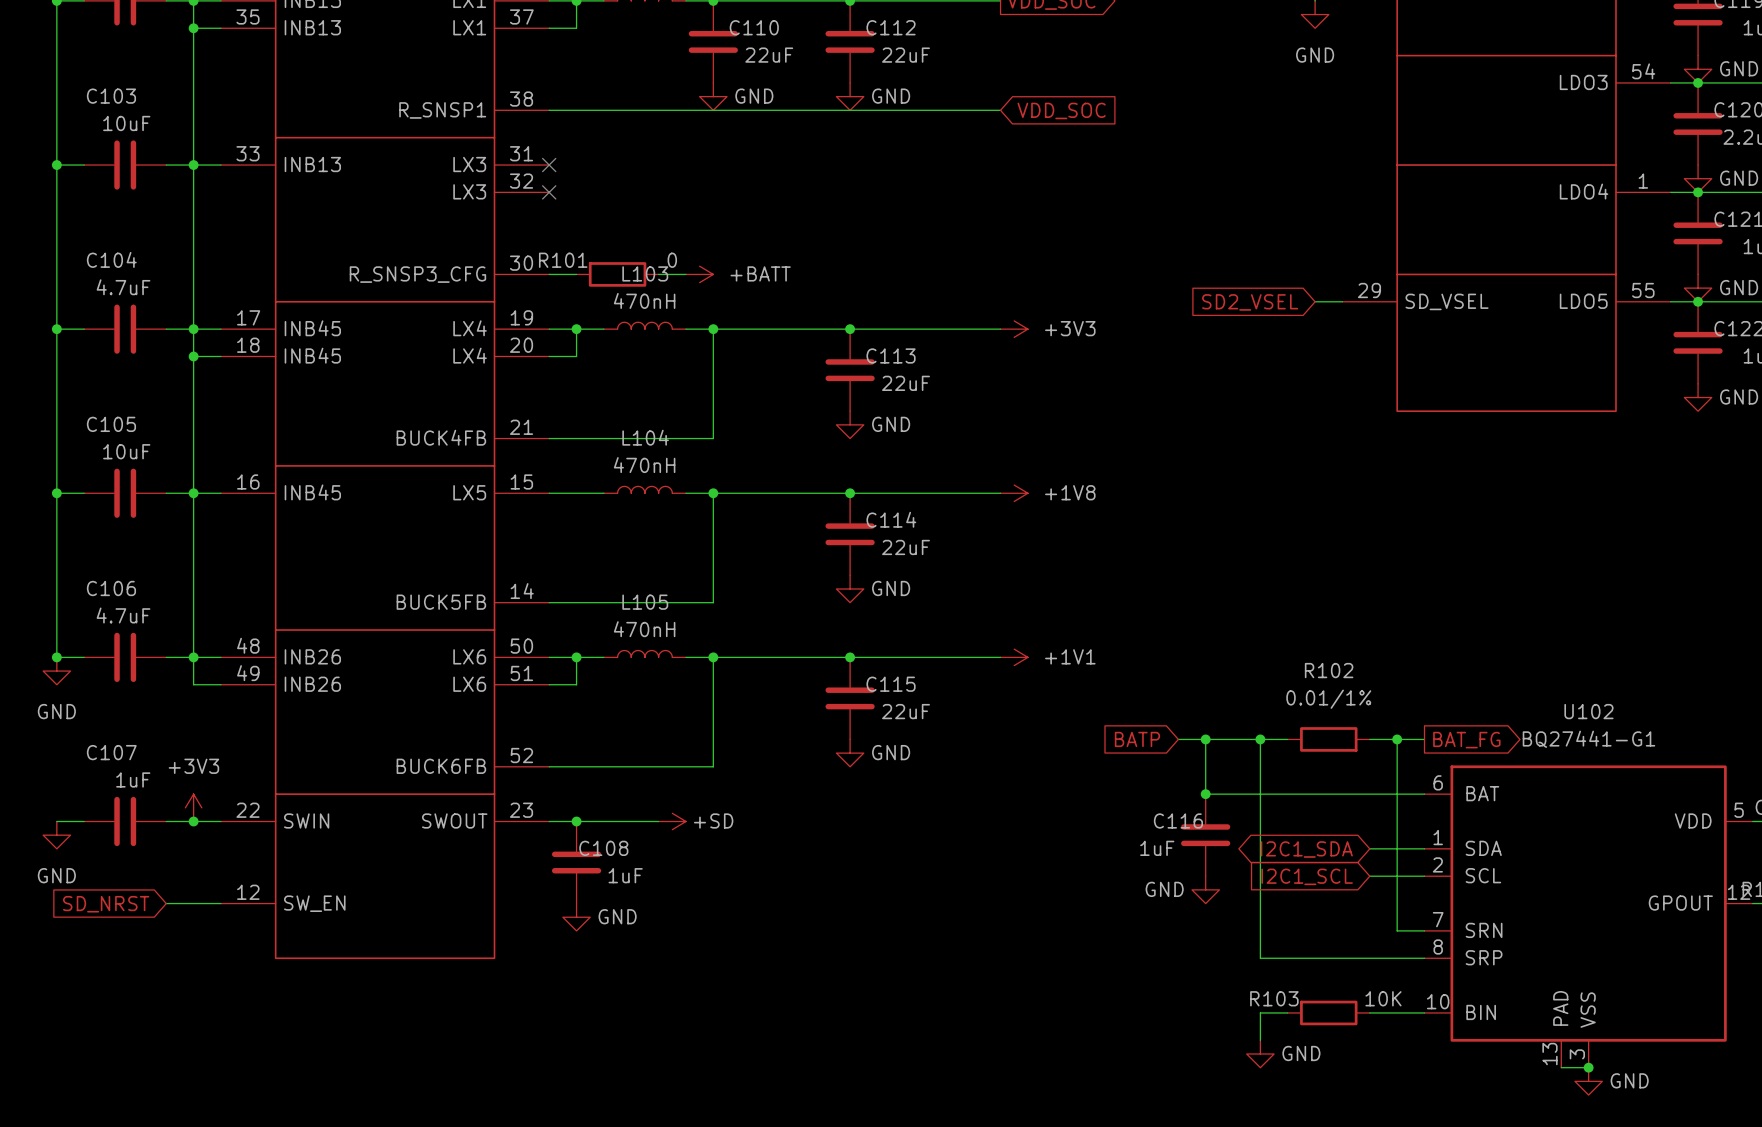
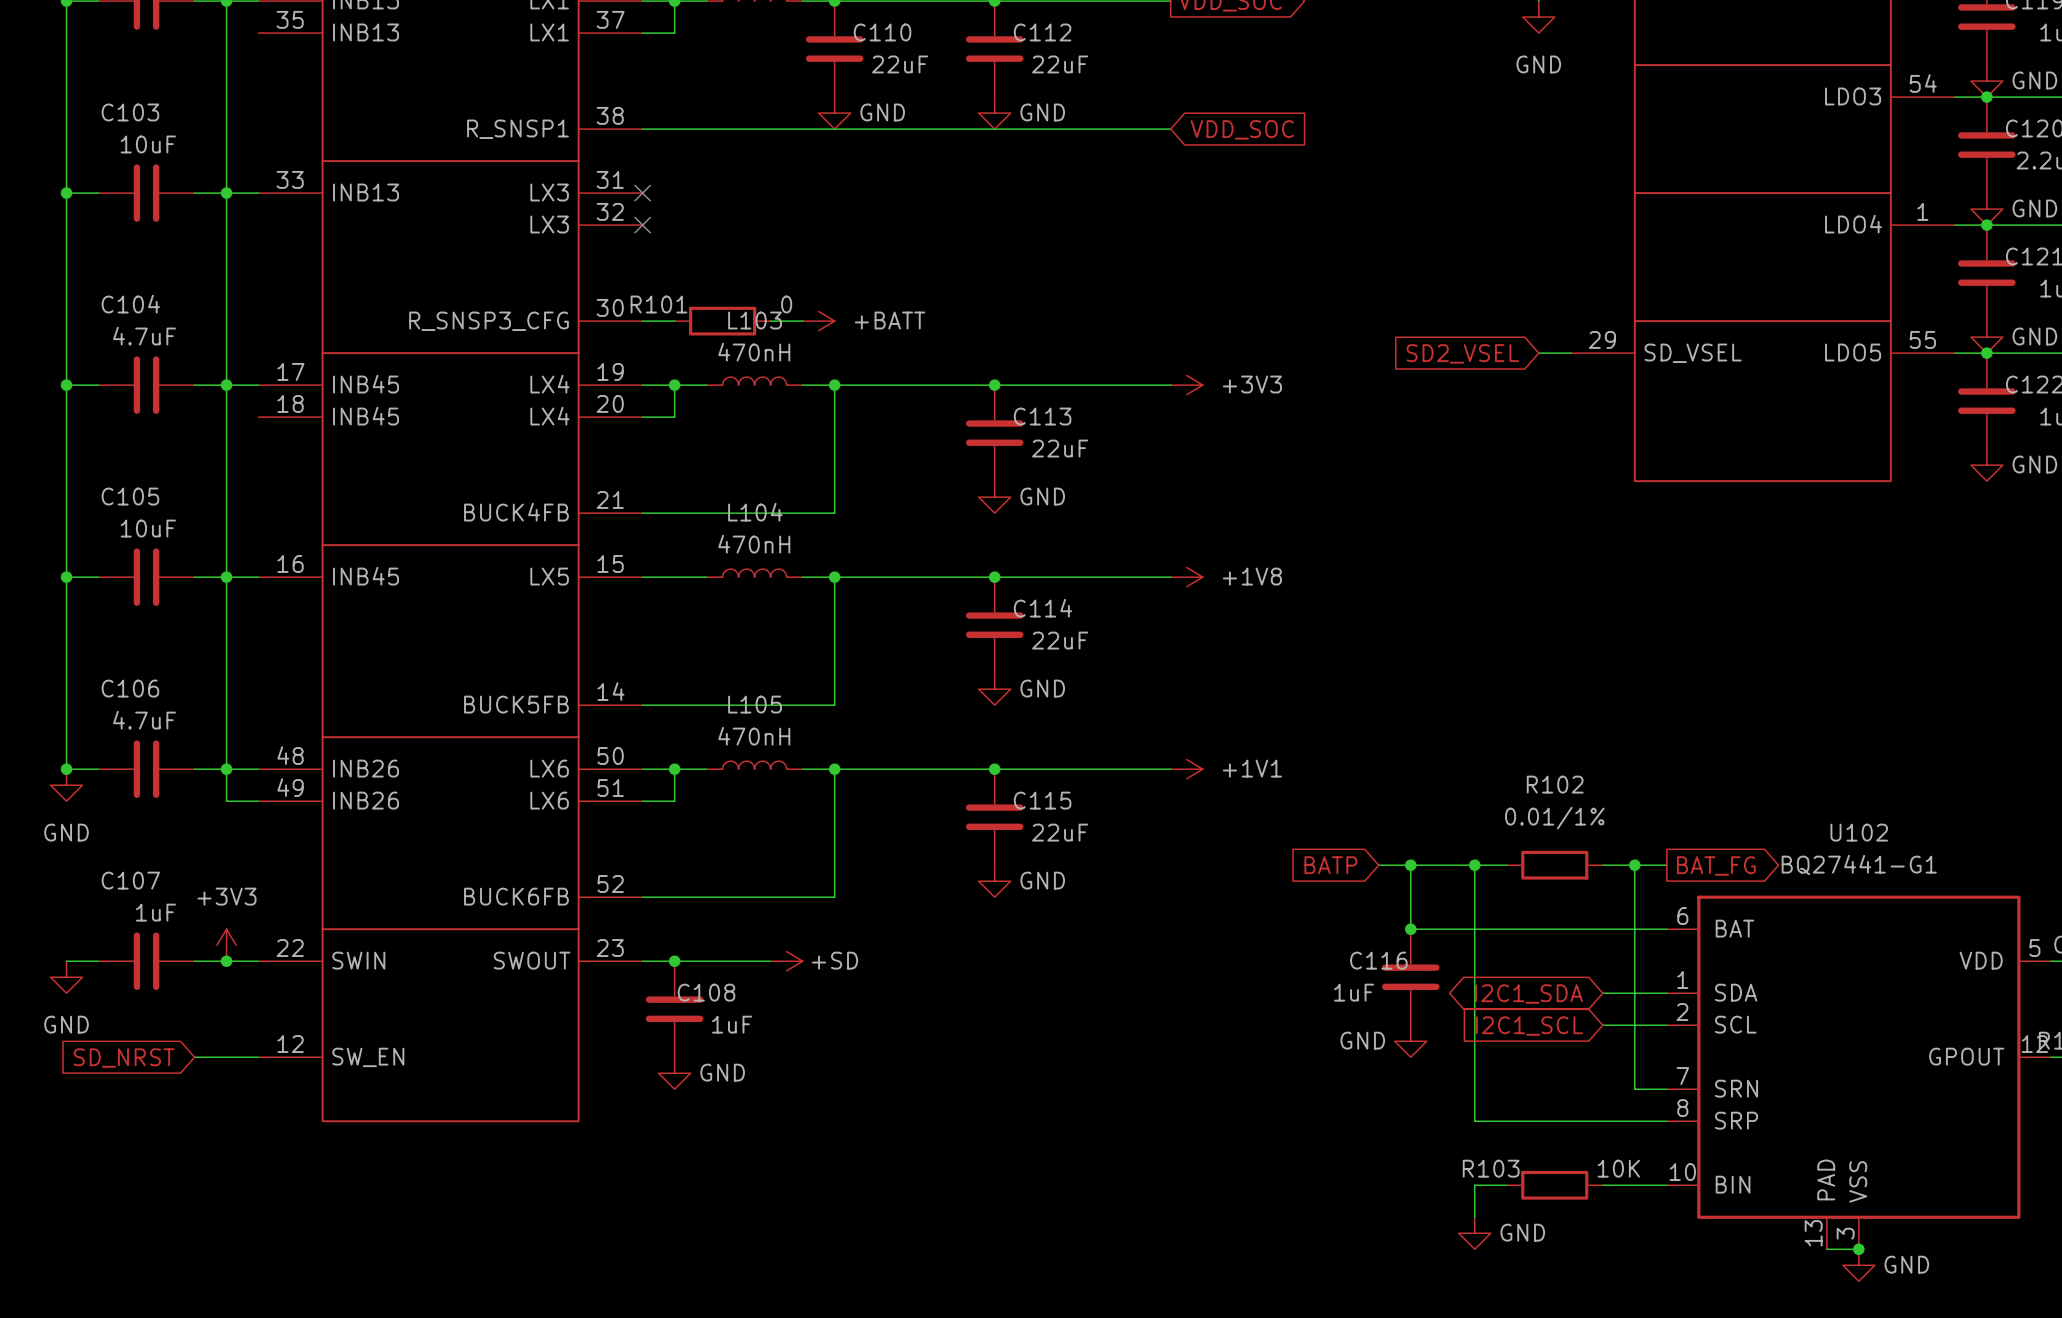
wire: (193, 28) (220, 28) -> none
junction: (193, 28) -> none
wire: (193, 356) (220, 356) -> none
junction: (193, 356) -> none

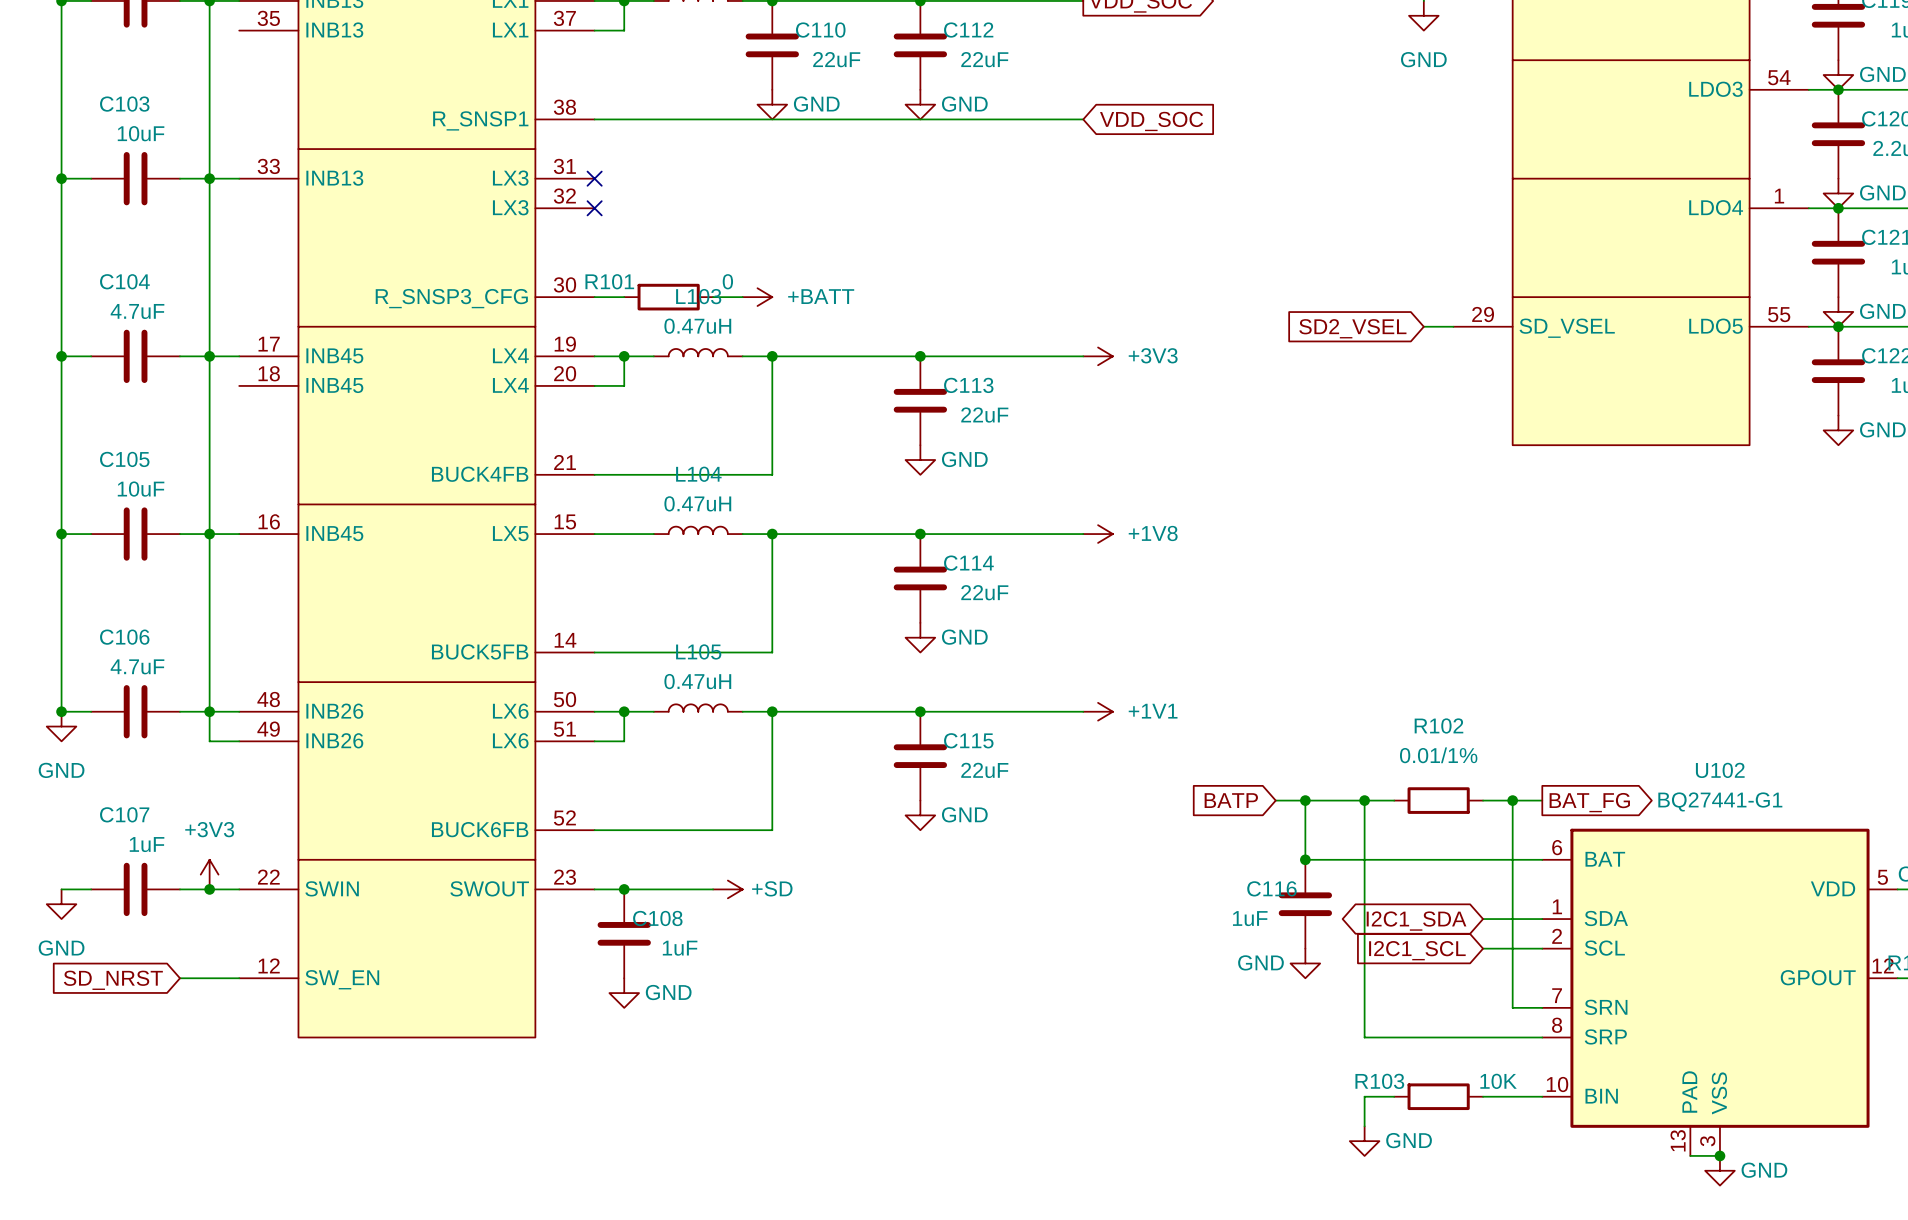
L103 value: 470nH (754, 352) -> 0.47uH (697, 326)
L104 value: 470nH (754, 544) -> 0.47uH (697, 503)
L105 value: 470nH (754, 736) -> 0.47uH (697, 681)

